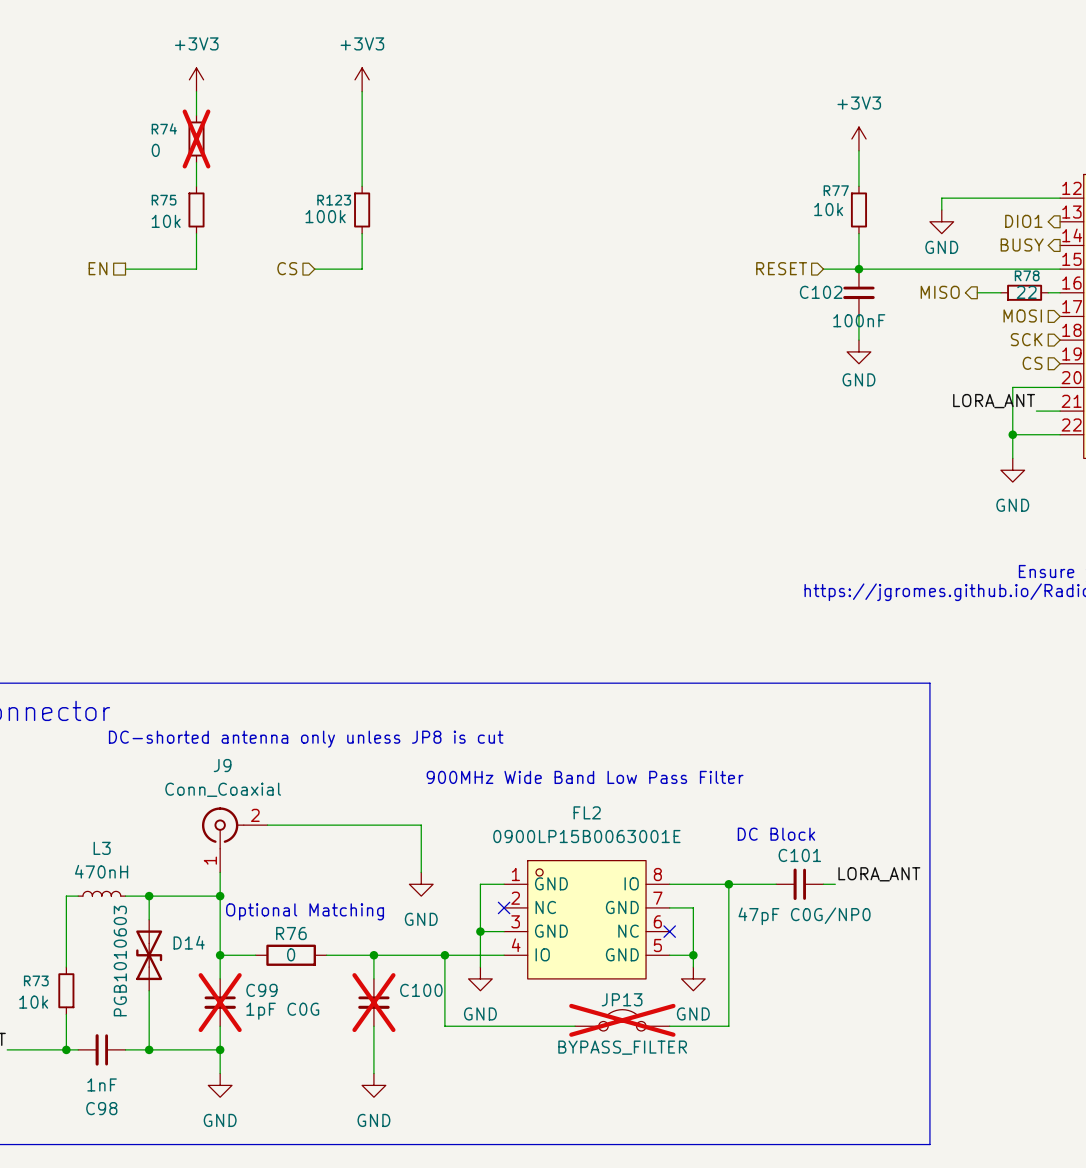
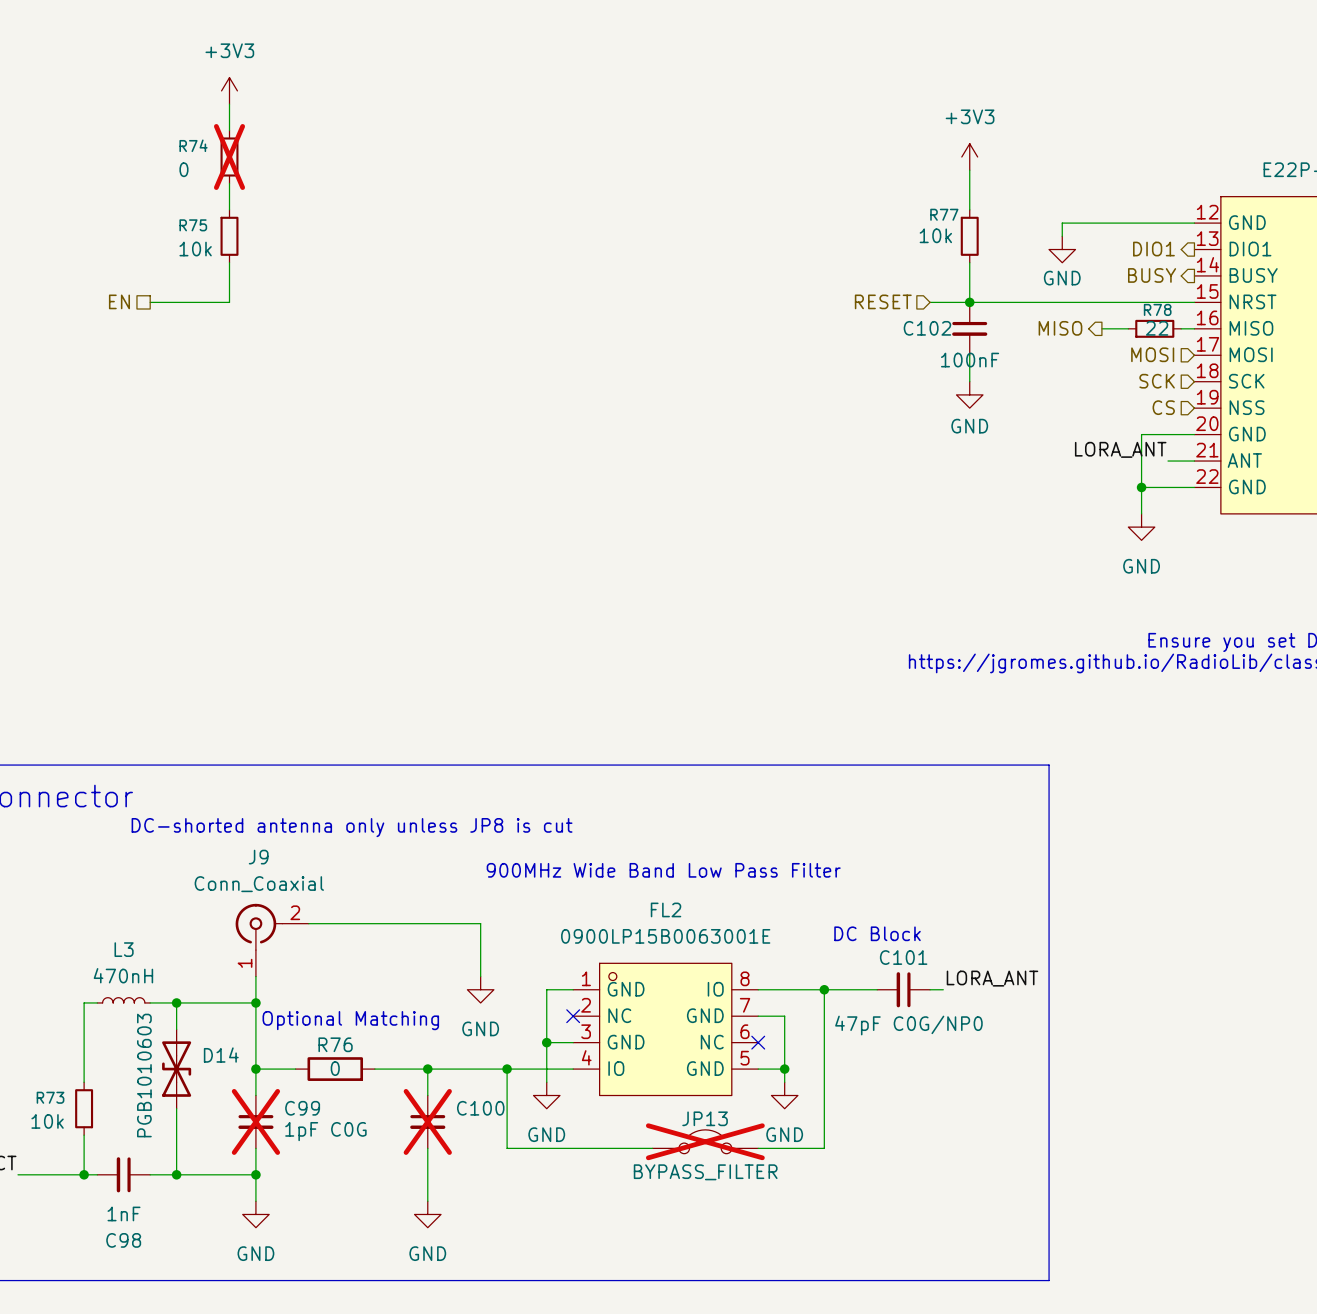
power symbol: +3V3 (362, 79) -> none
wire: (362, 91) (362, 186) -> none
R123: 100k (362, 209) -> none
wire: (362, 233) (362, 269) (314, 269) -> none
hierarchical label: CS (287, 268) -> none

